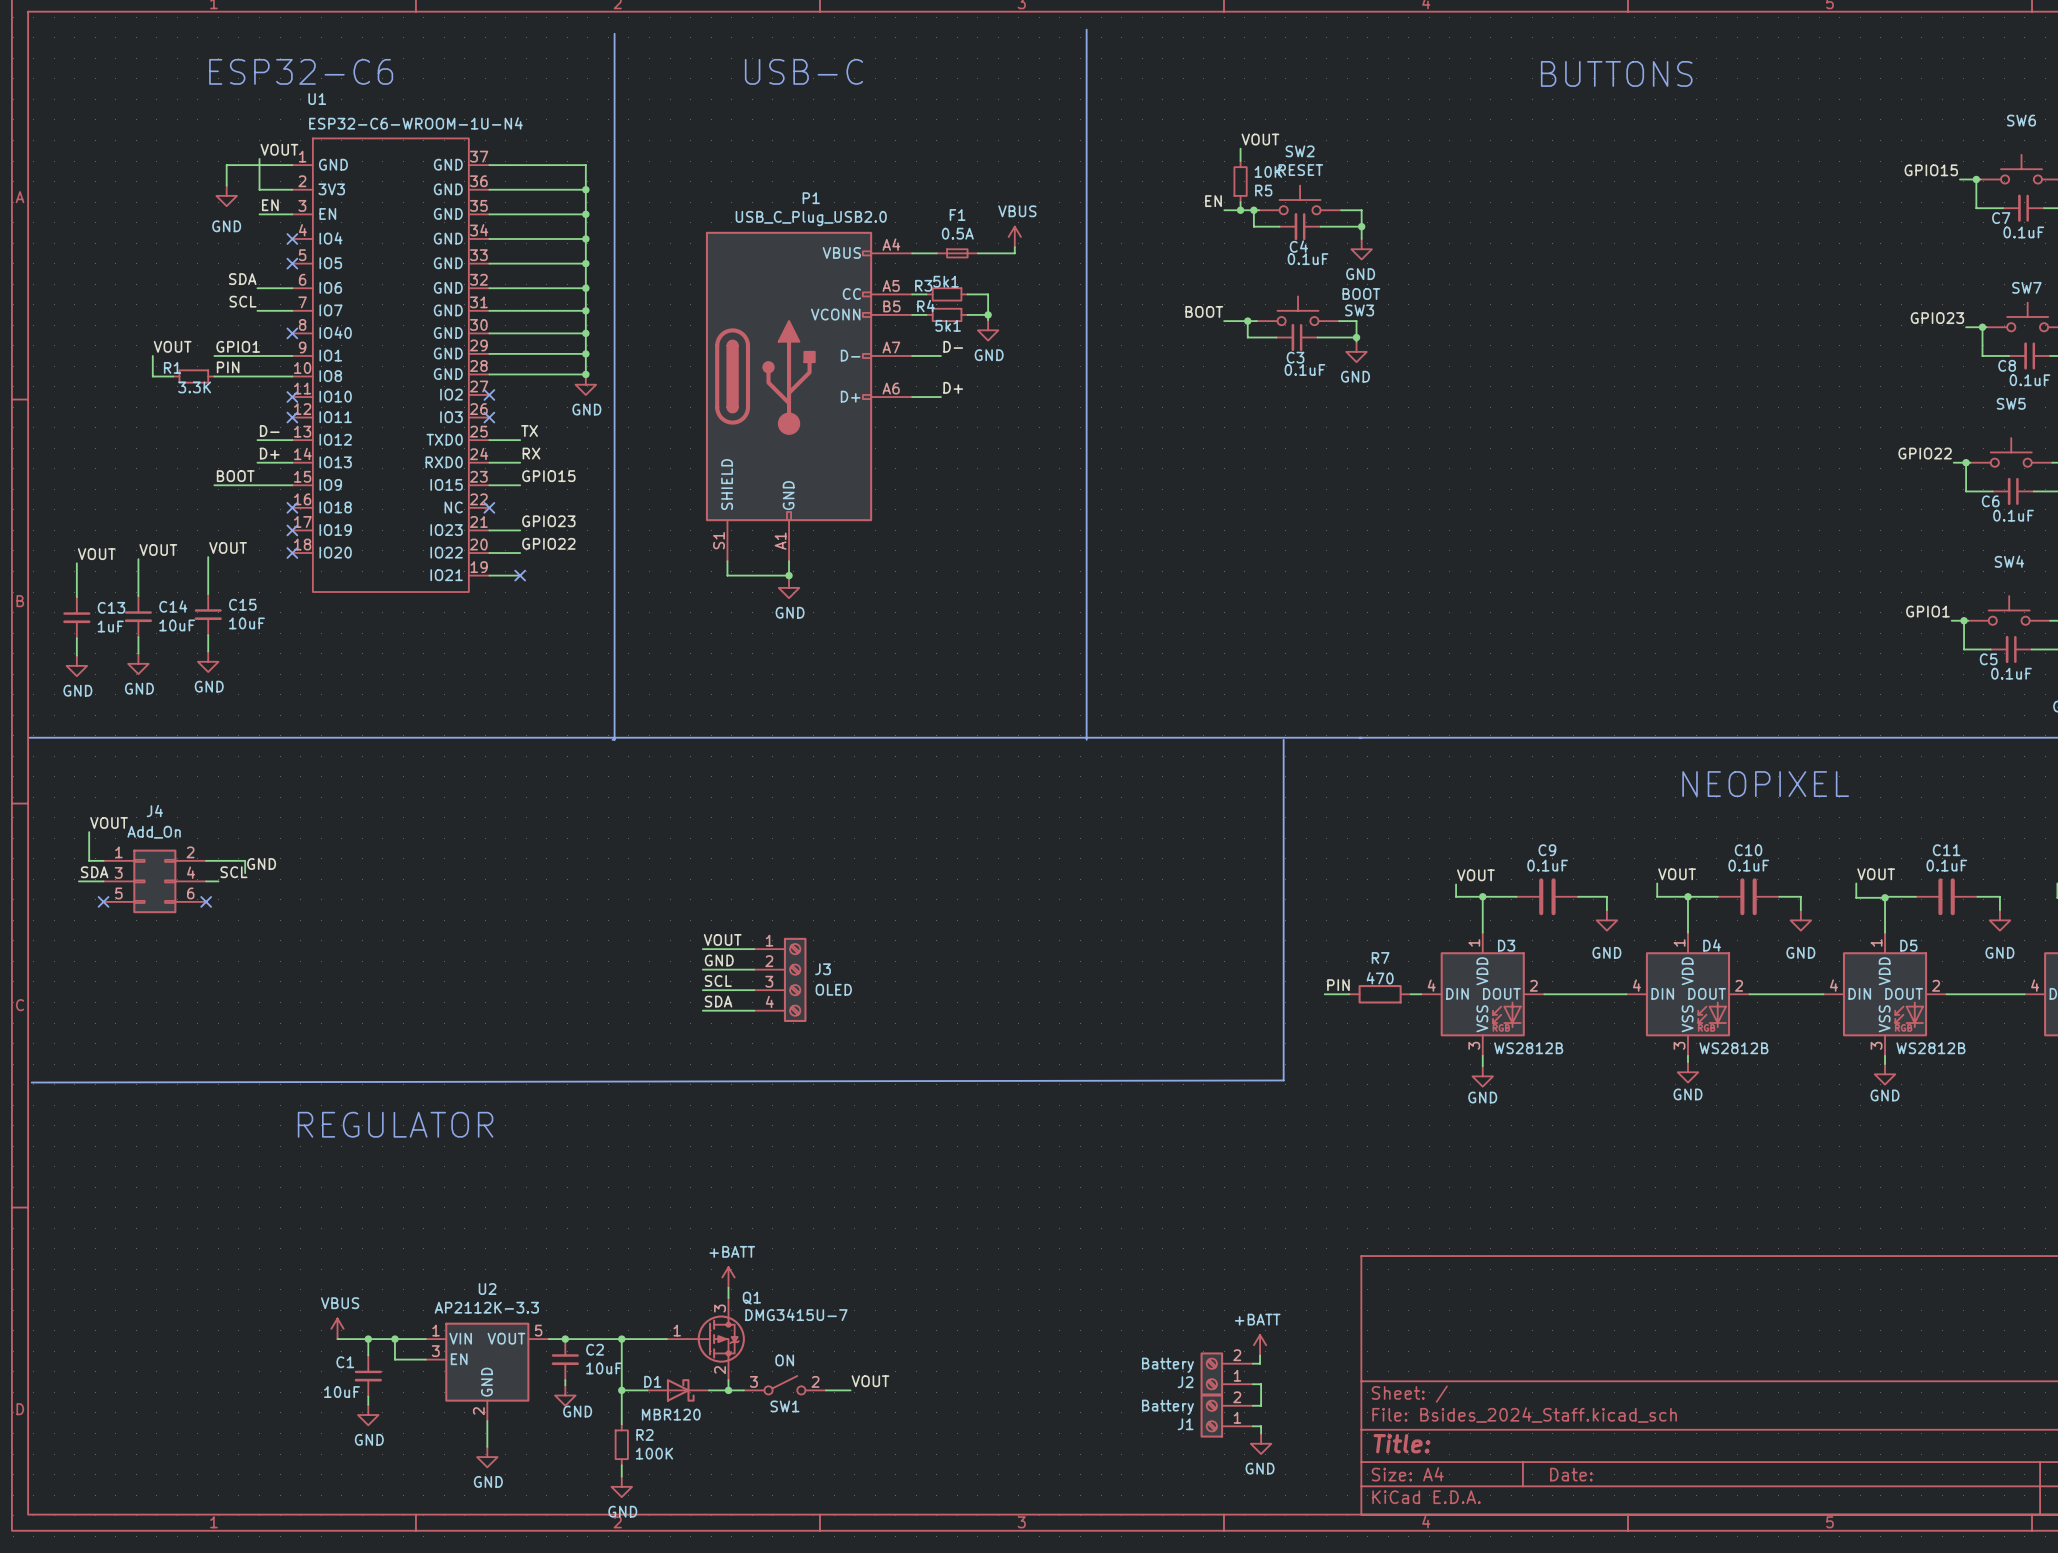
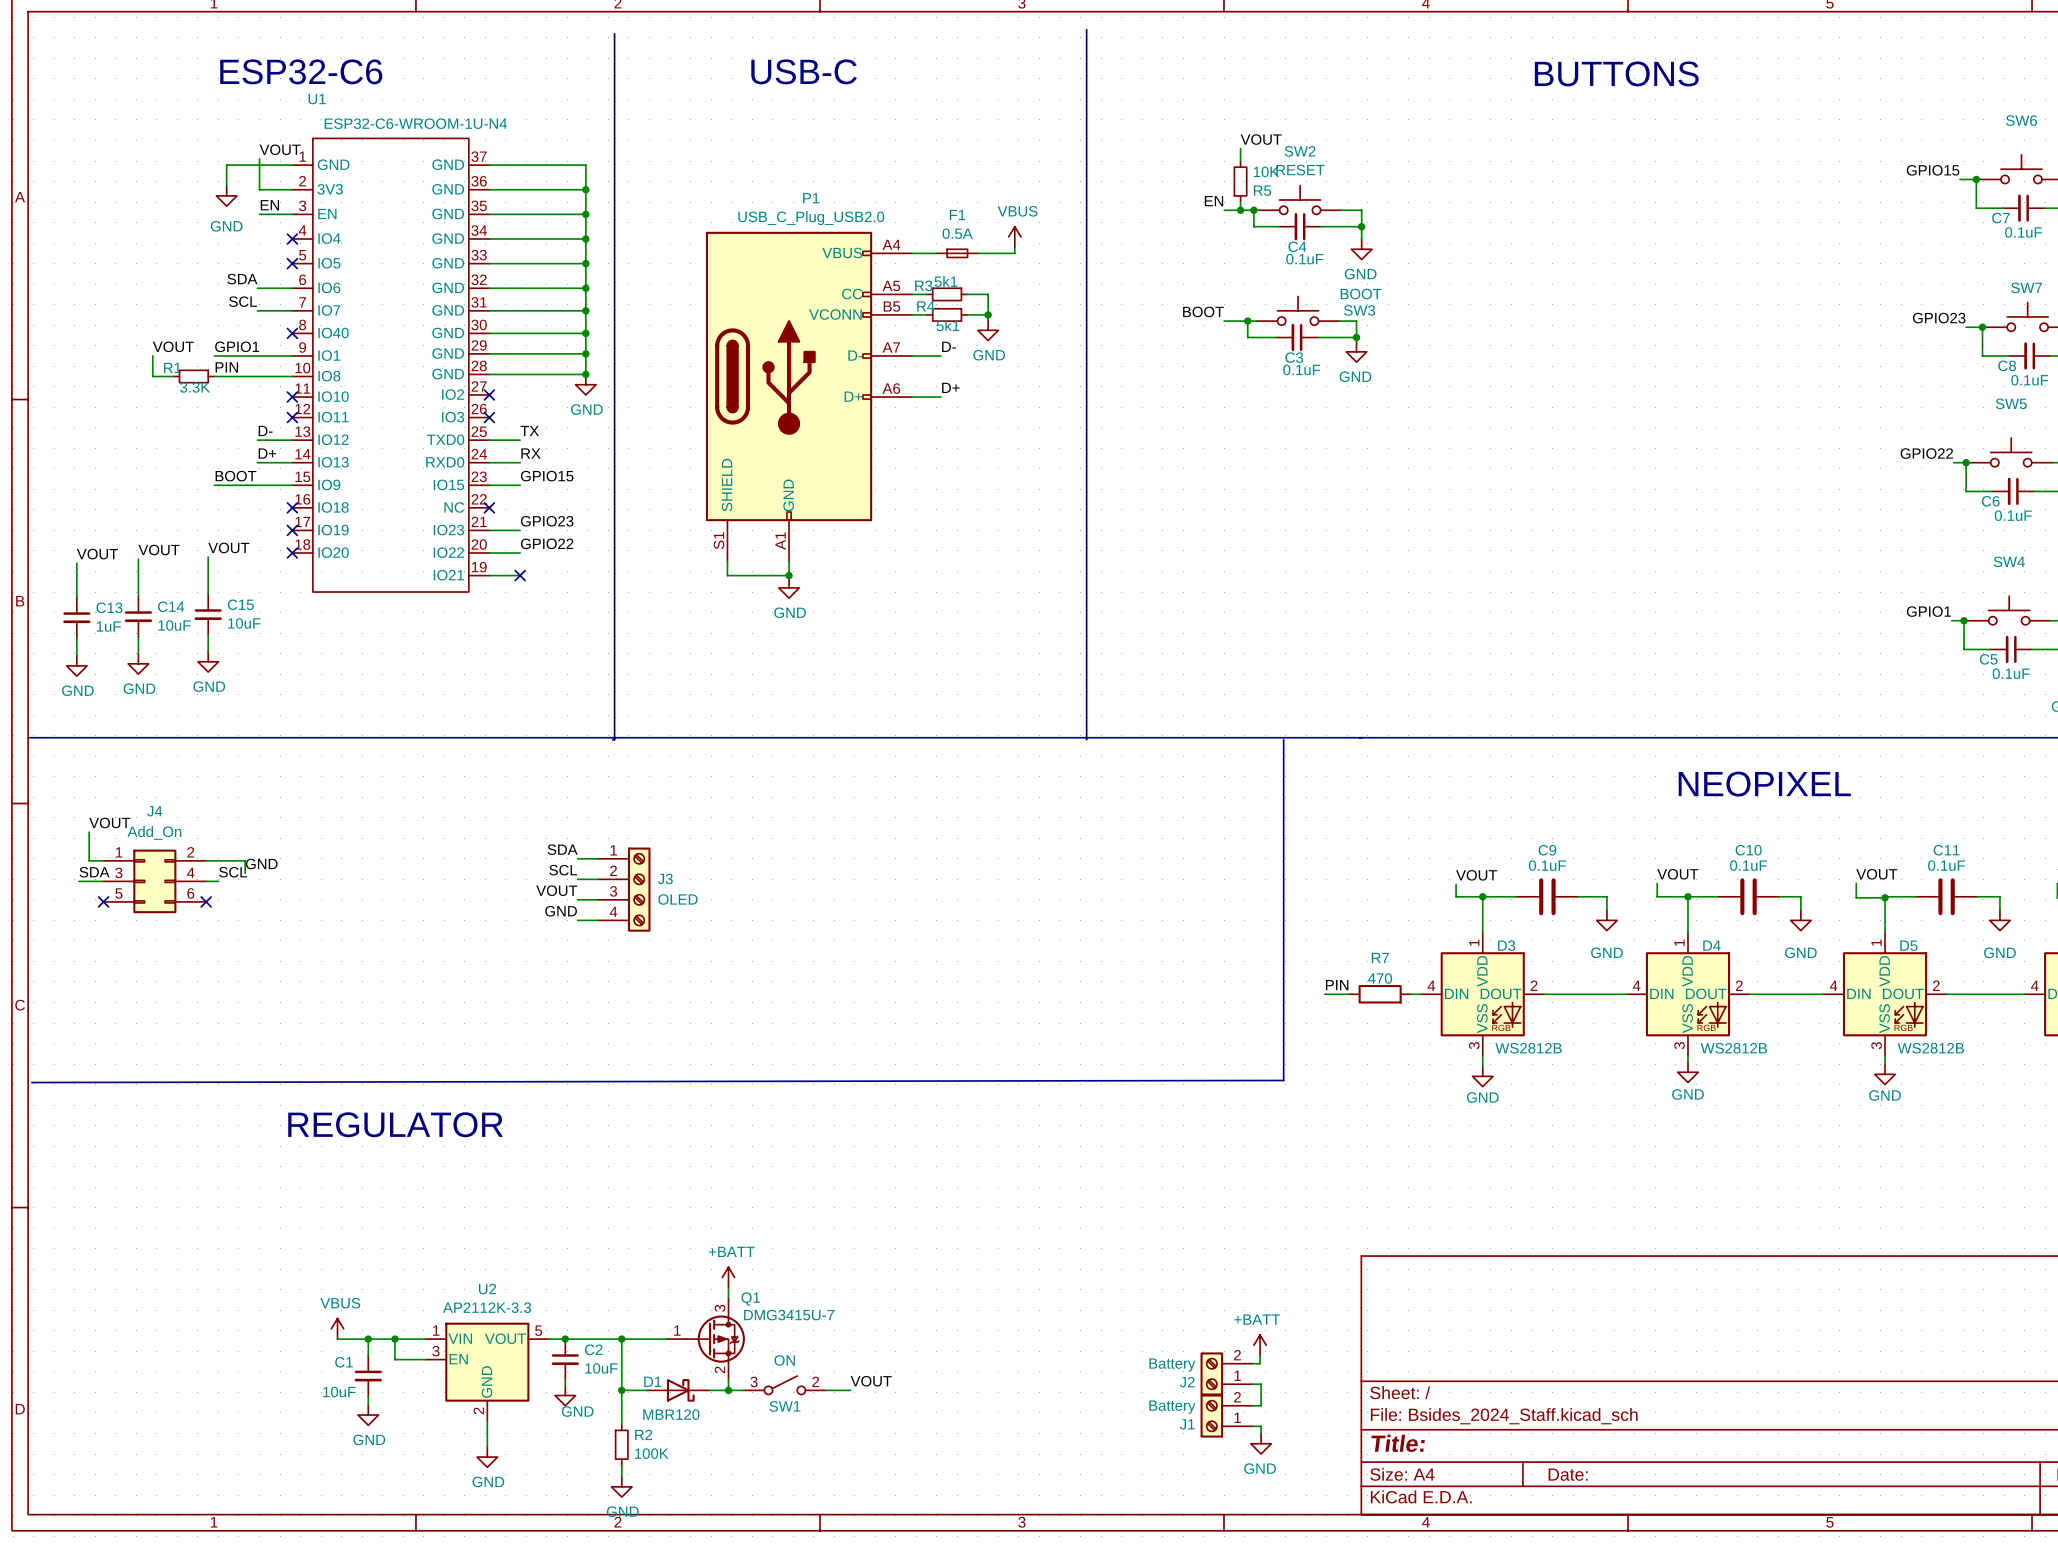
wire: none -> (577, 858) (598, 858)
wire: none -> (577, 879) (598, 879)
wire: none -> (577, 899) (598, 899)
wire: none -> (577, 920) (598, 920)
label position: VOUT (722, 939) -> VOUT (556, 890)
wire: (702, 949) (754, 949) -> none
label position: GND (719, 960) -> GND (561, 911)
wire: (702, 969) (754, 969) -> none
J3 position: (780, 979) -> (624, 889)
label position: SCL (718, 981) -> SCL (563, 870)
wire: (702, 990) (754, 990) -> none
label position: SDA (718, 1001) -> SDA (562, 849)
wire: (702, 1010) (754, 1010) -> none

